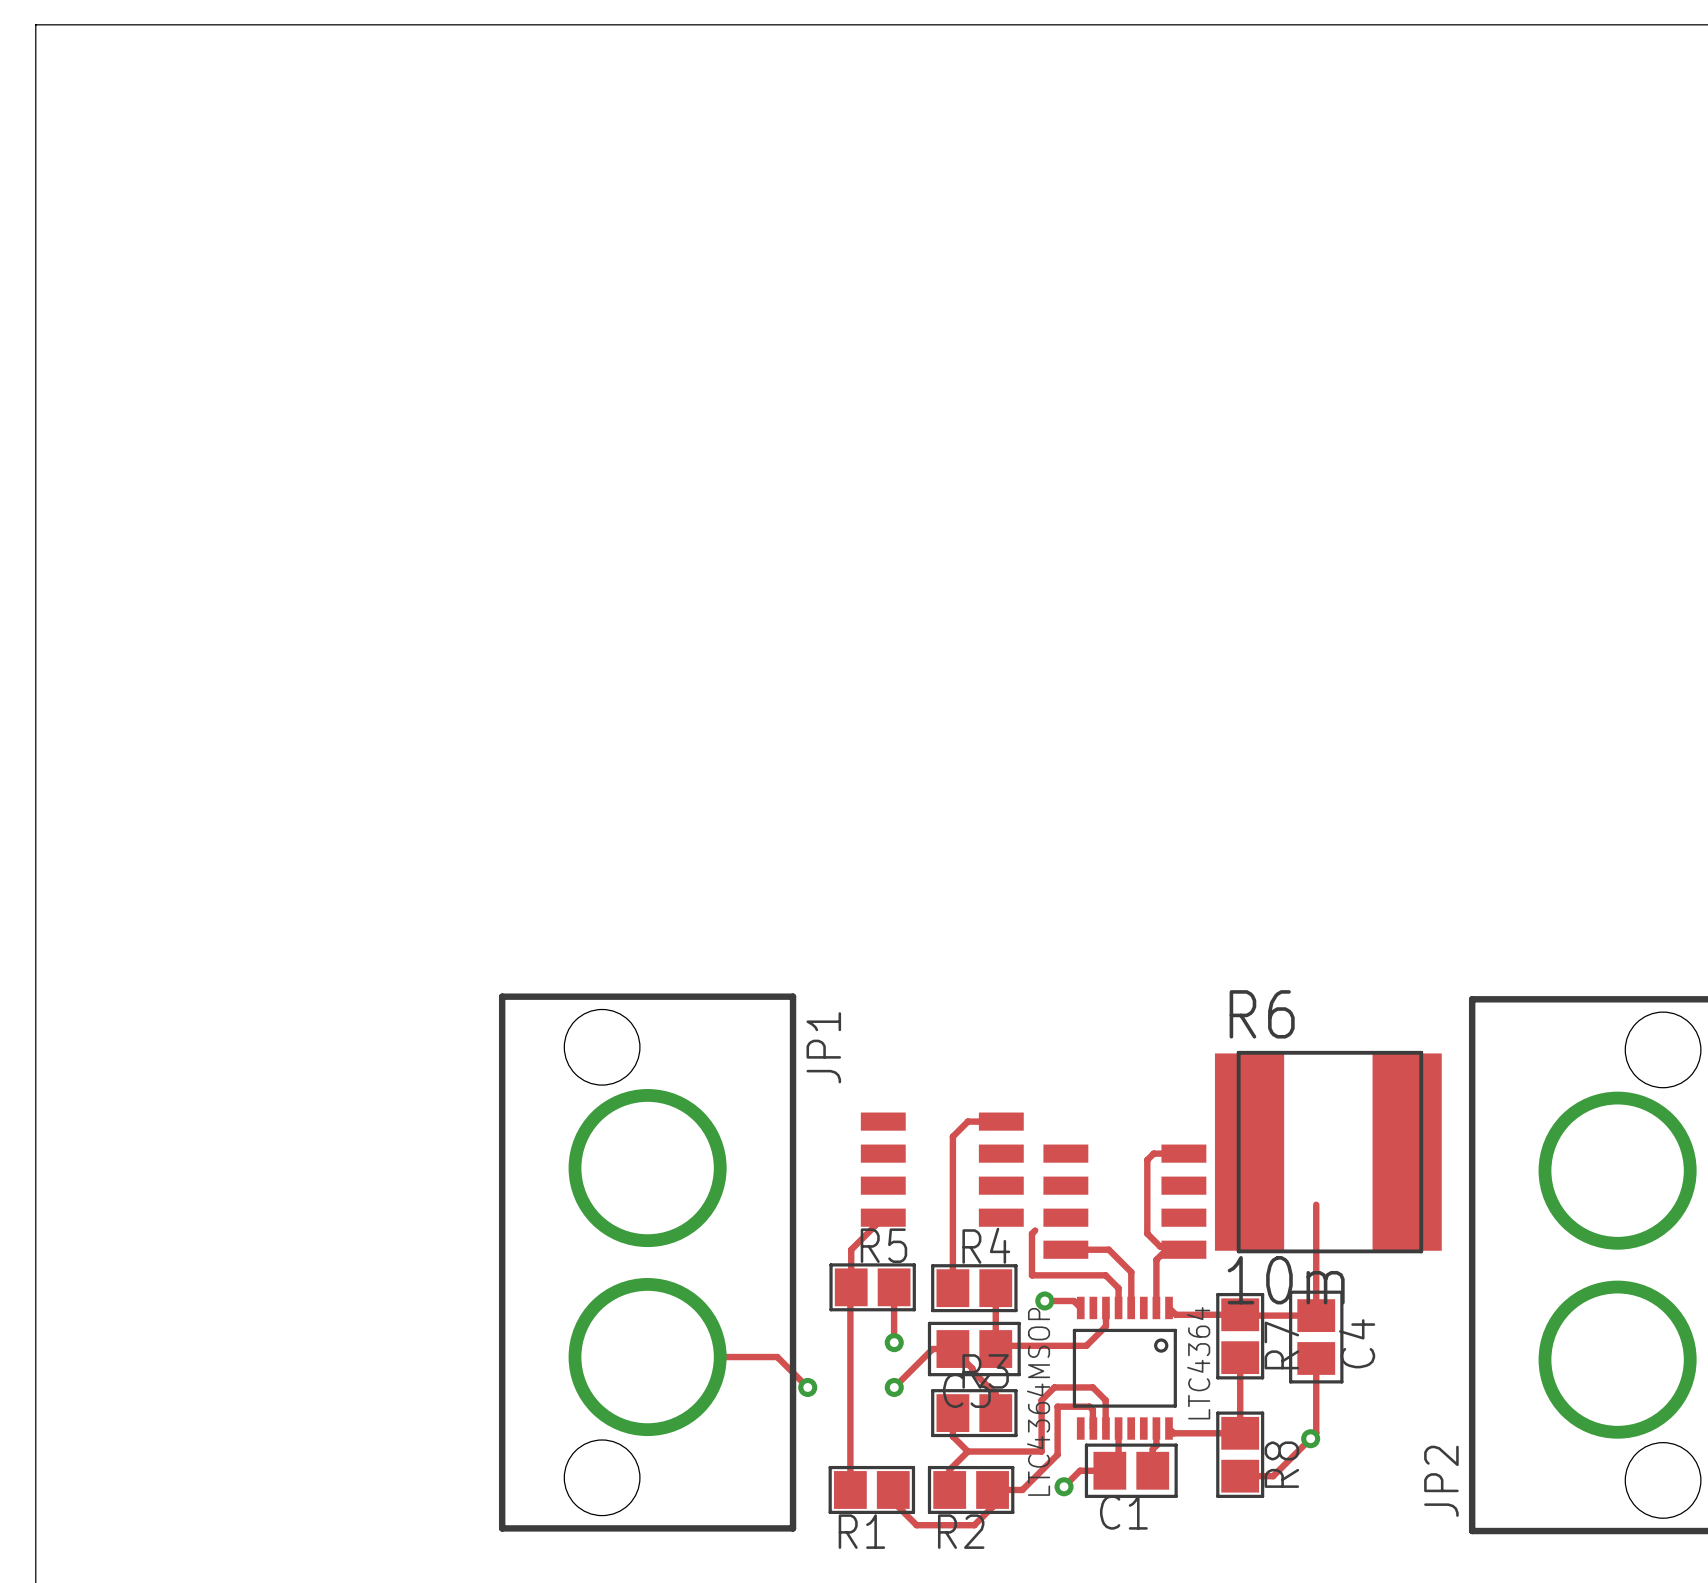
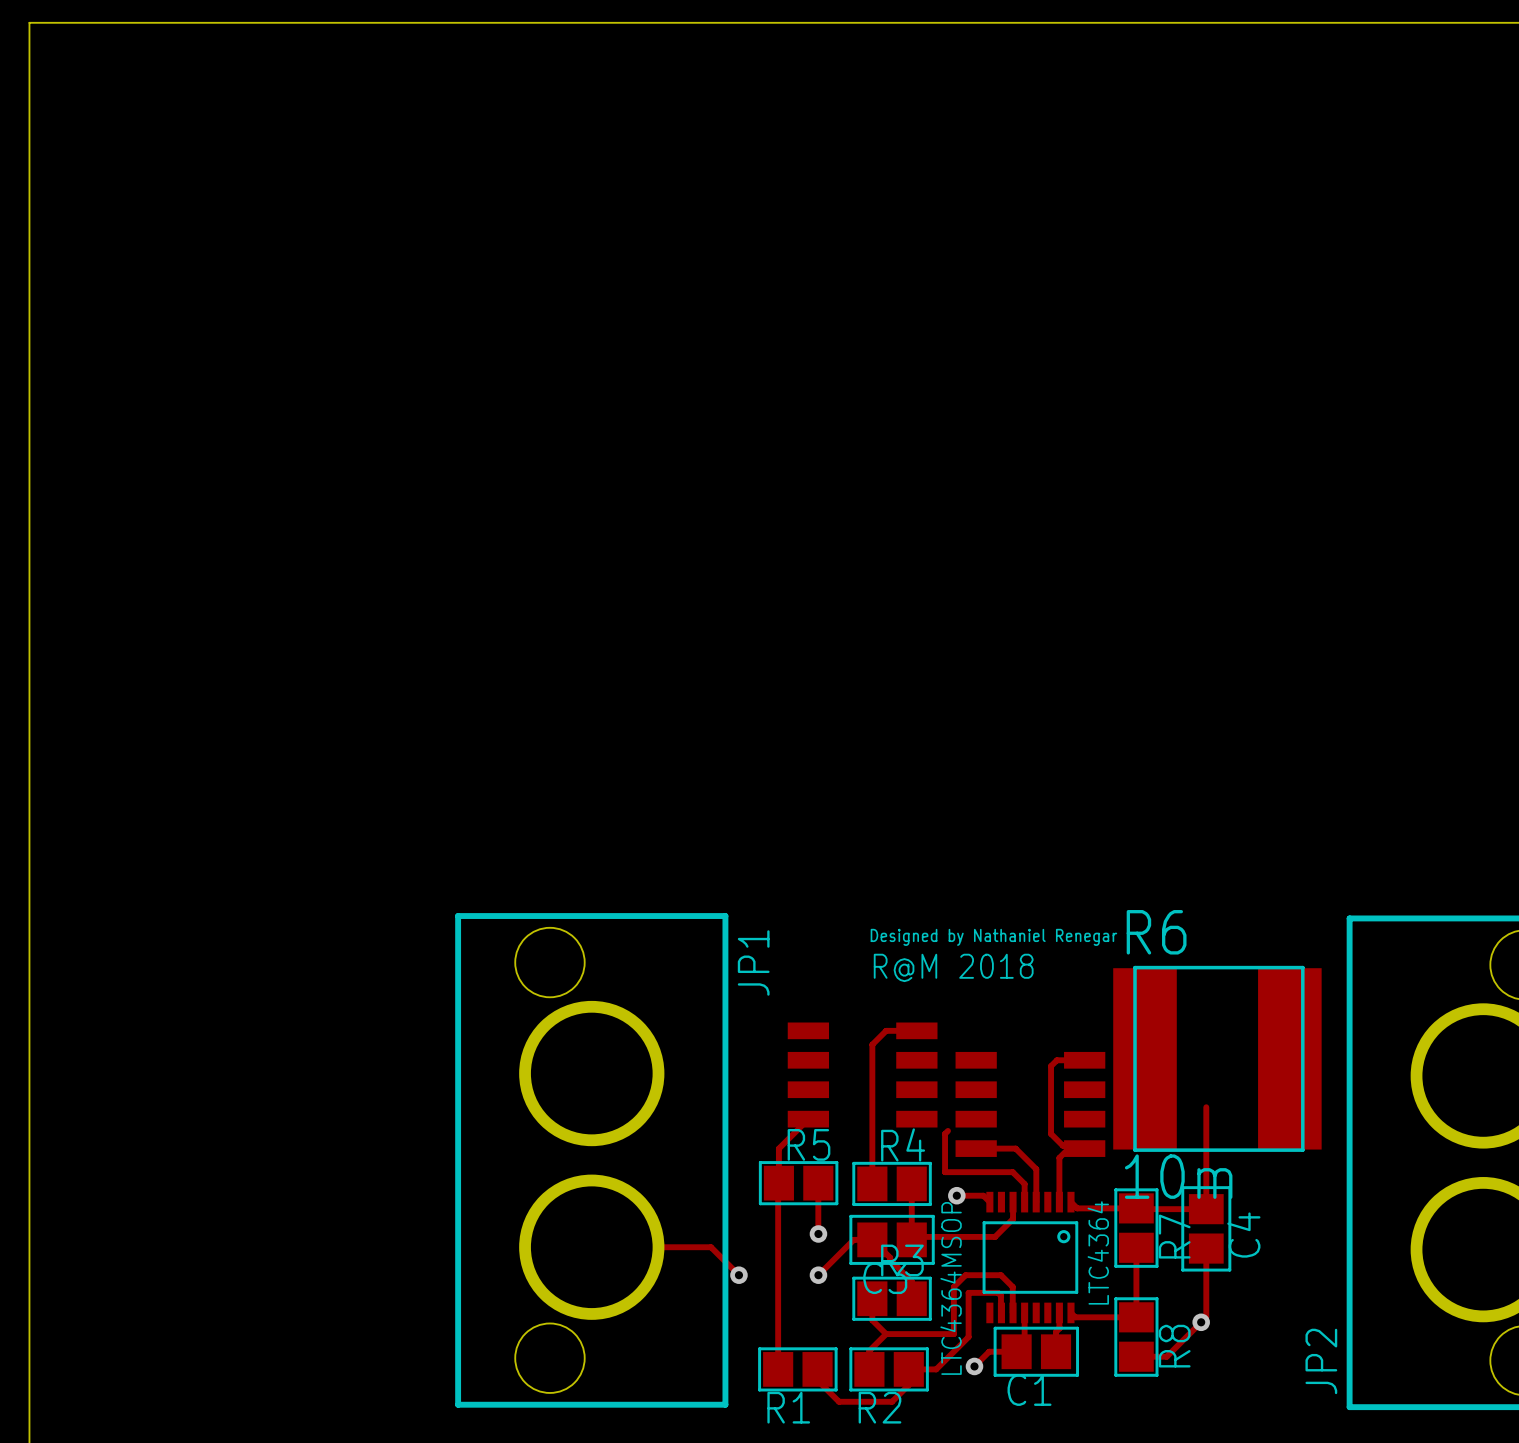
text: none -> Designed by Nathaniel Renegar (993, 937)
text: none -> R@M 2018 (953, 967)

